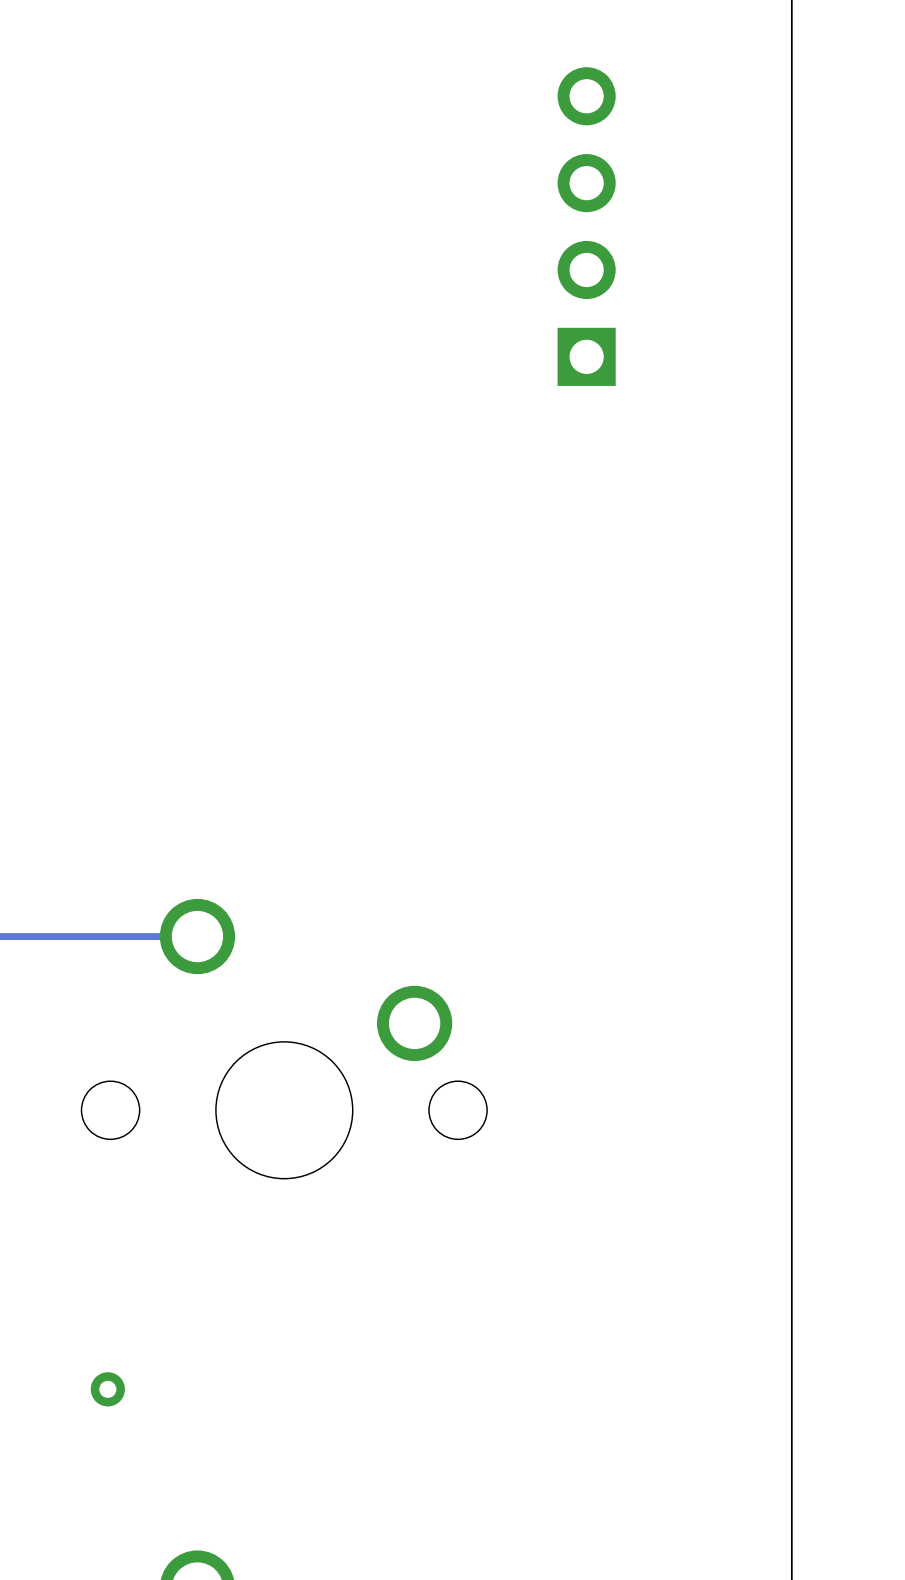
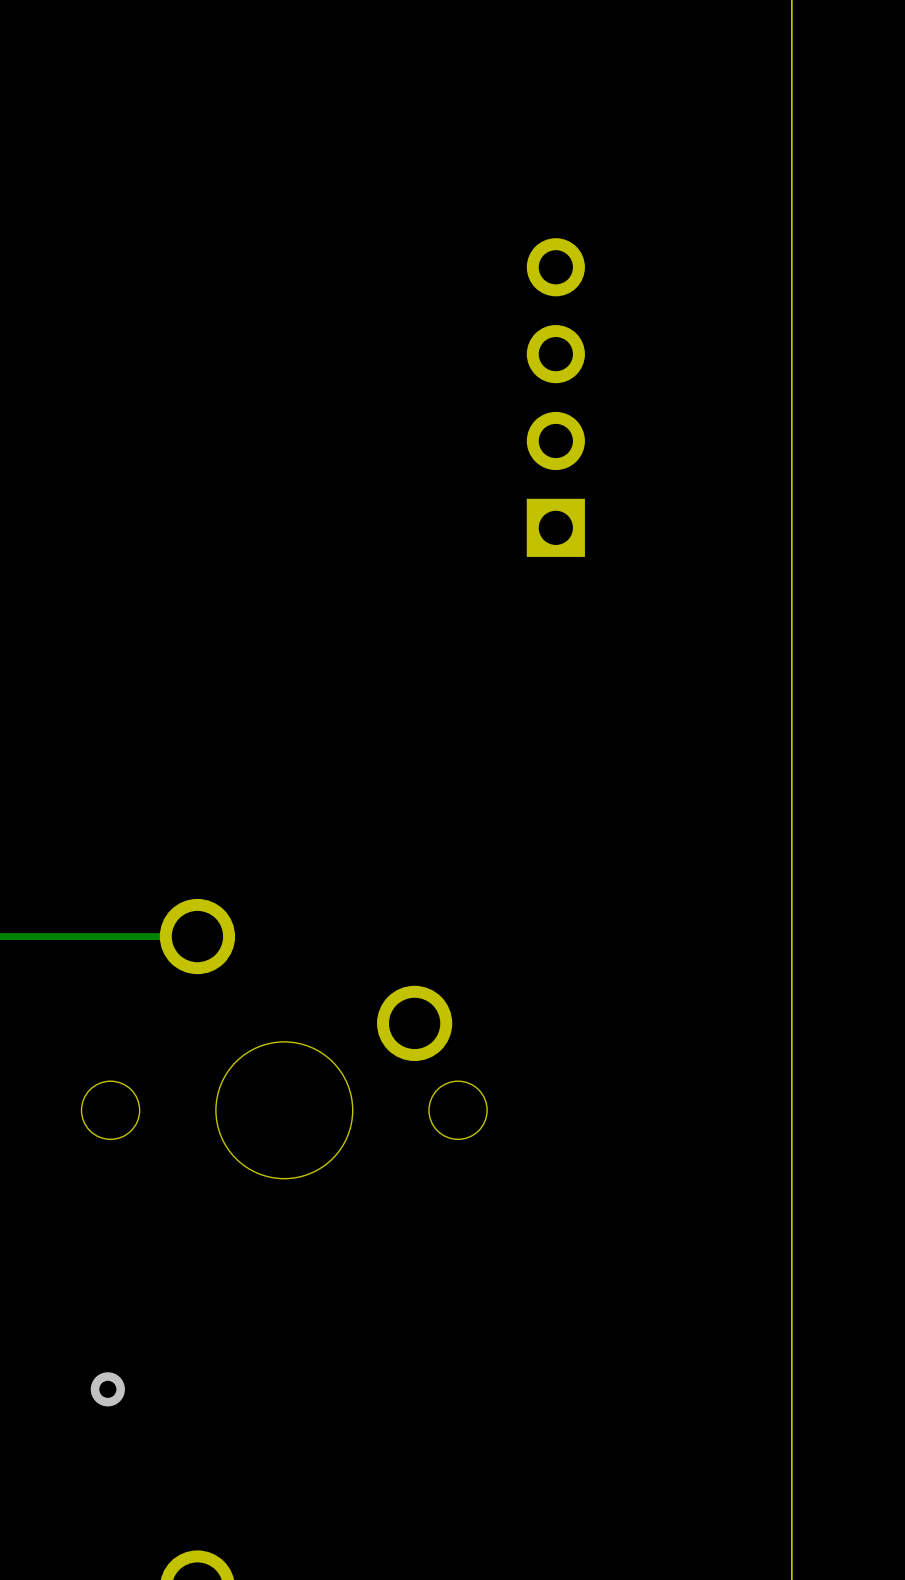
part position: (586, 226) -> (555, 397)

